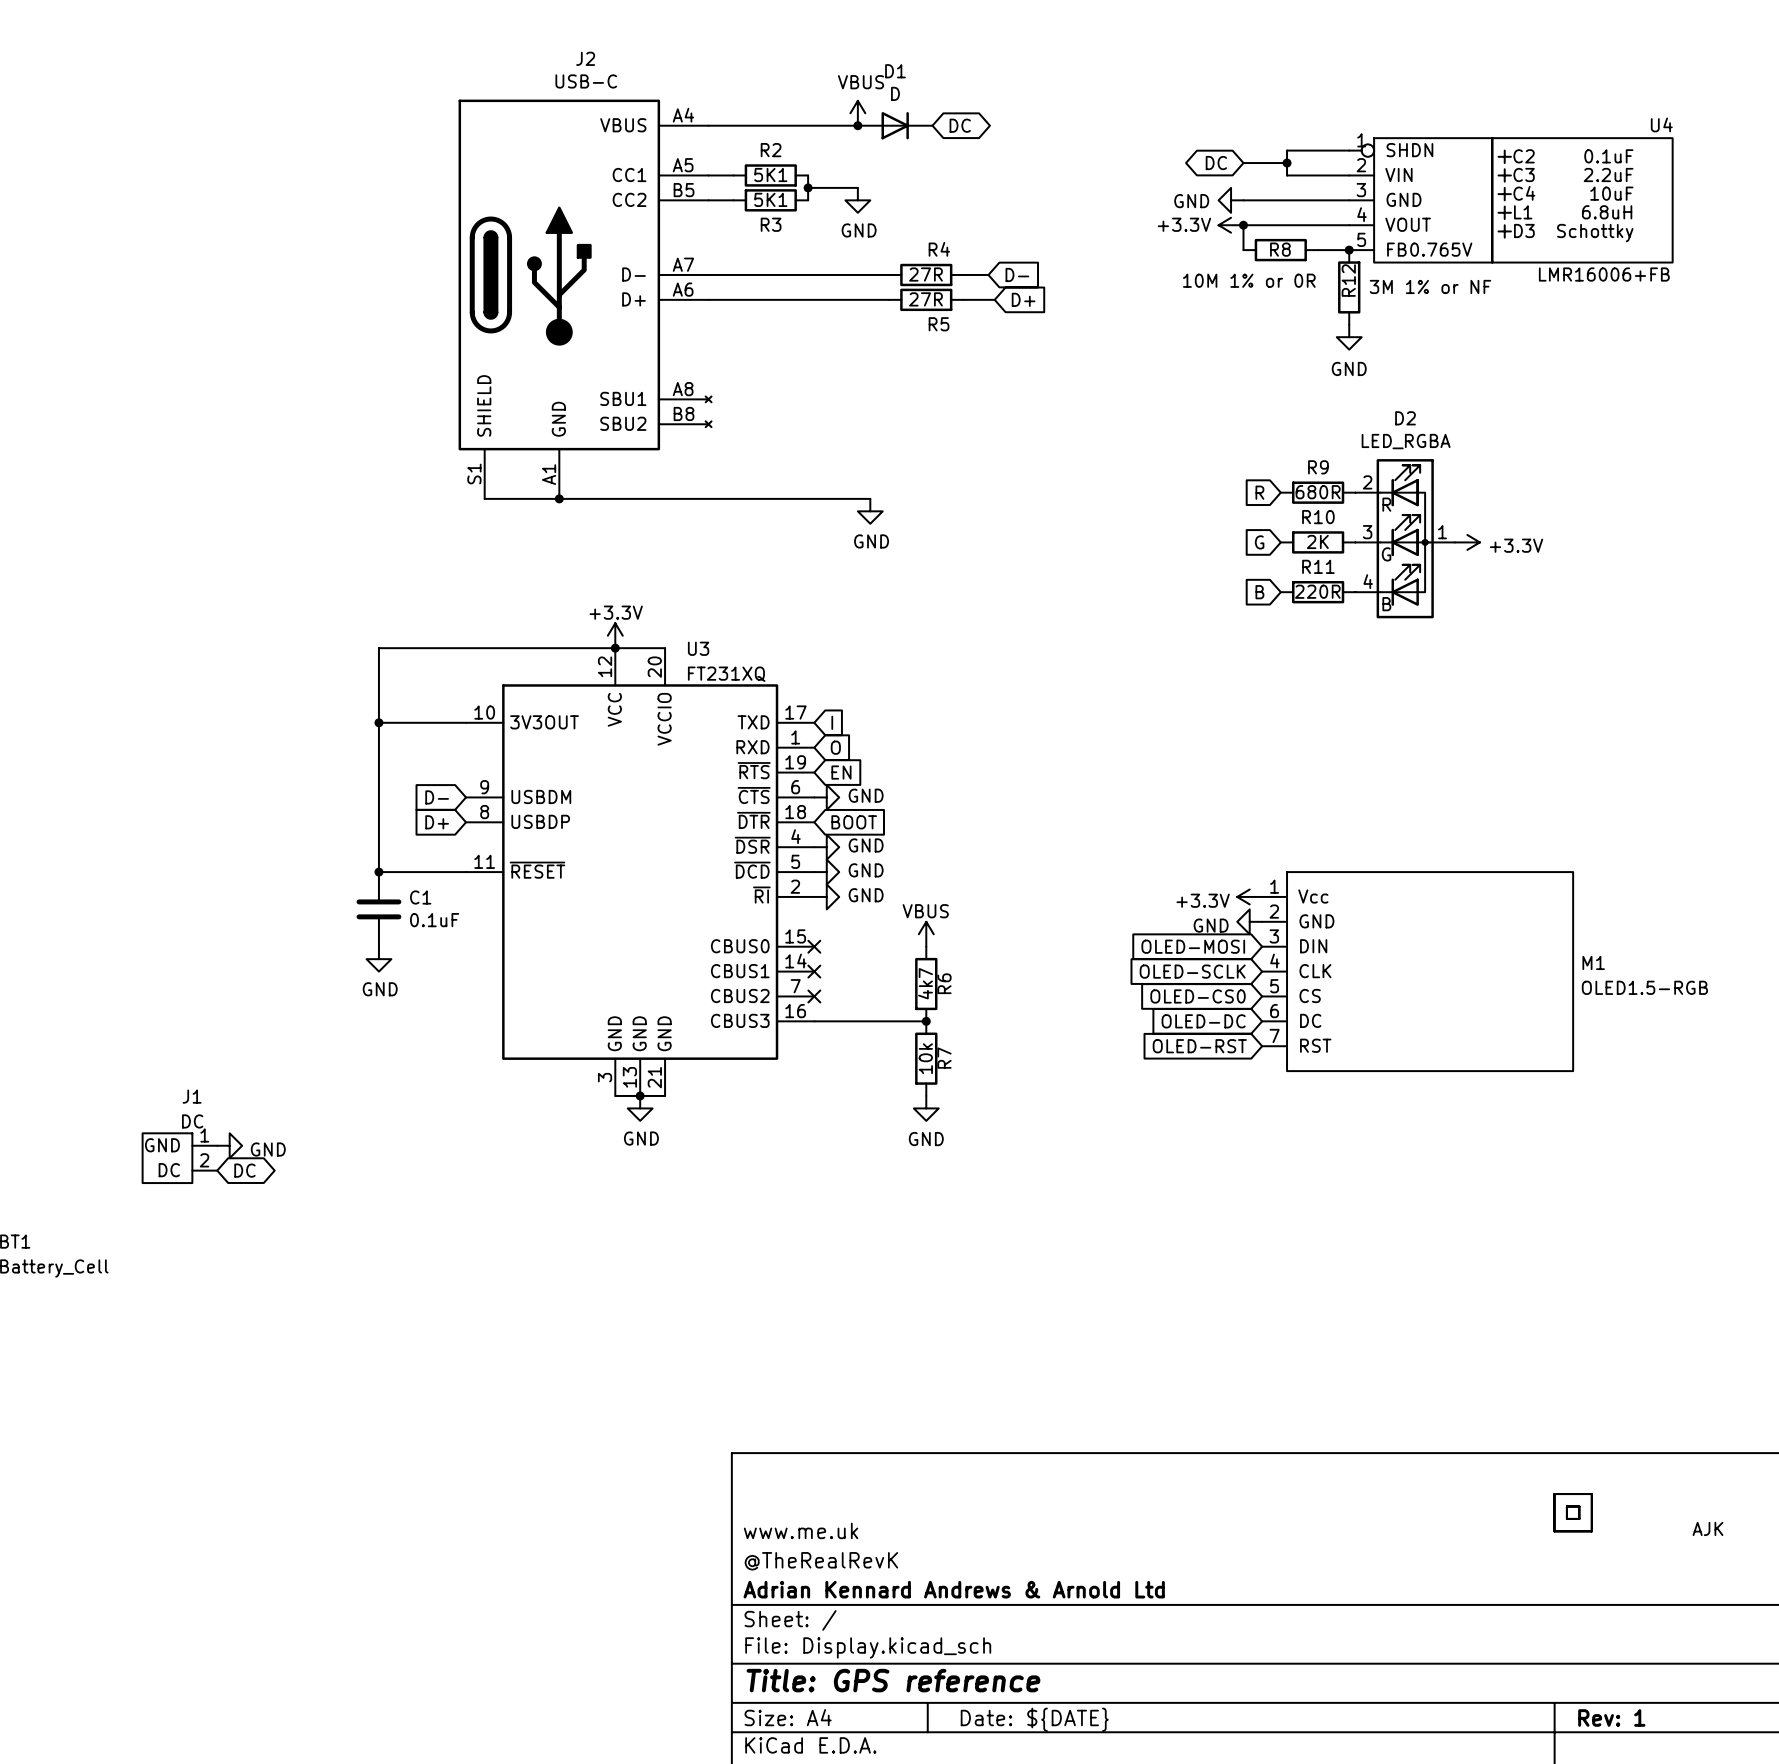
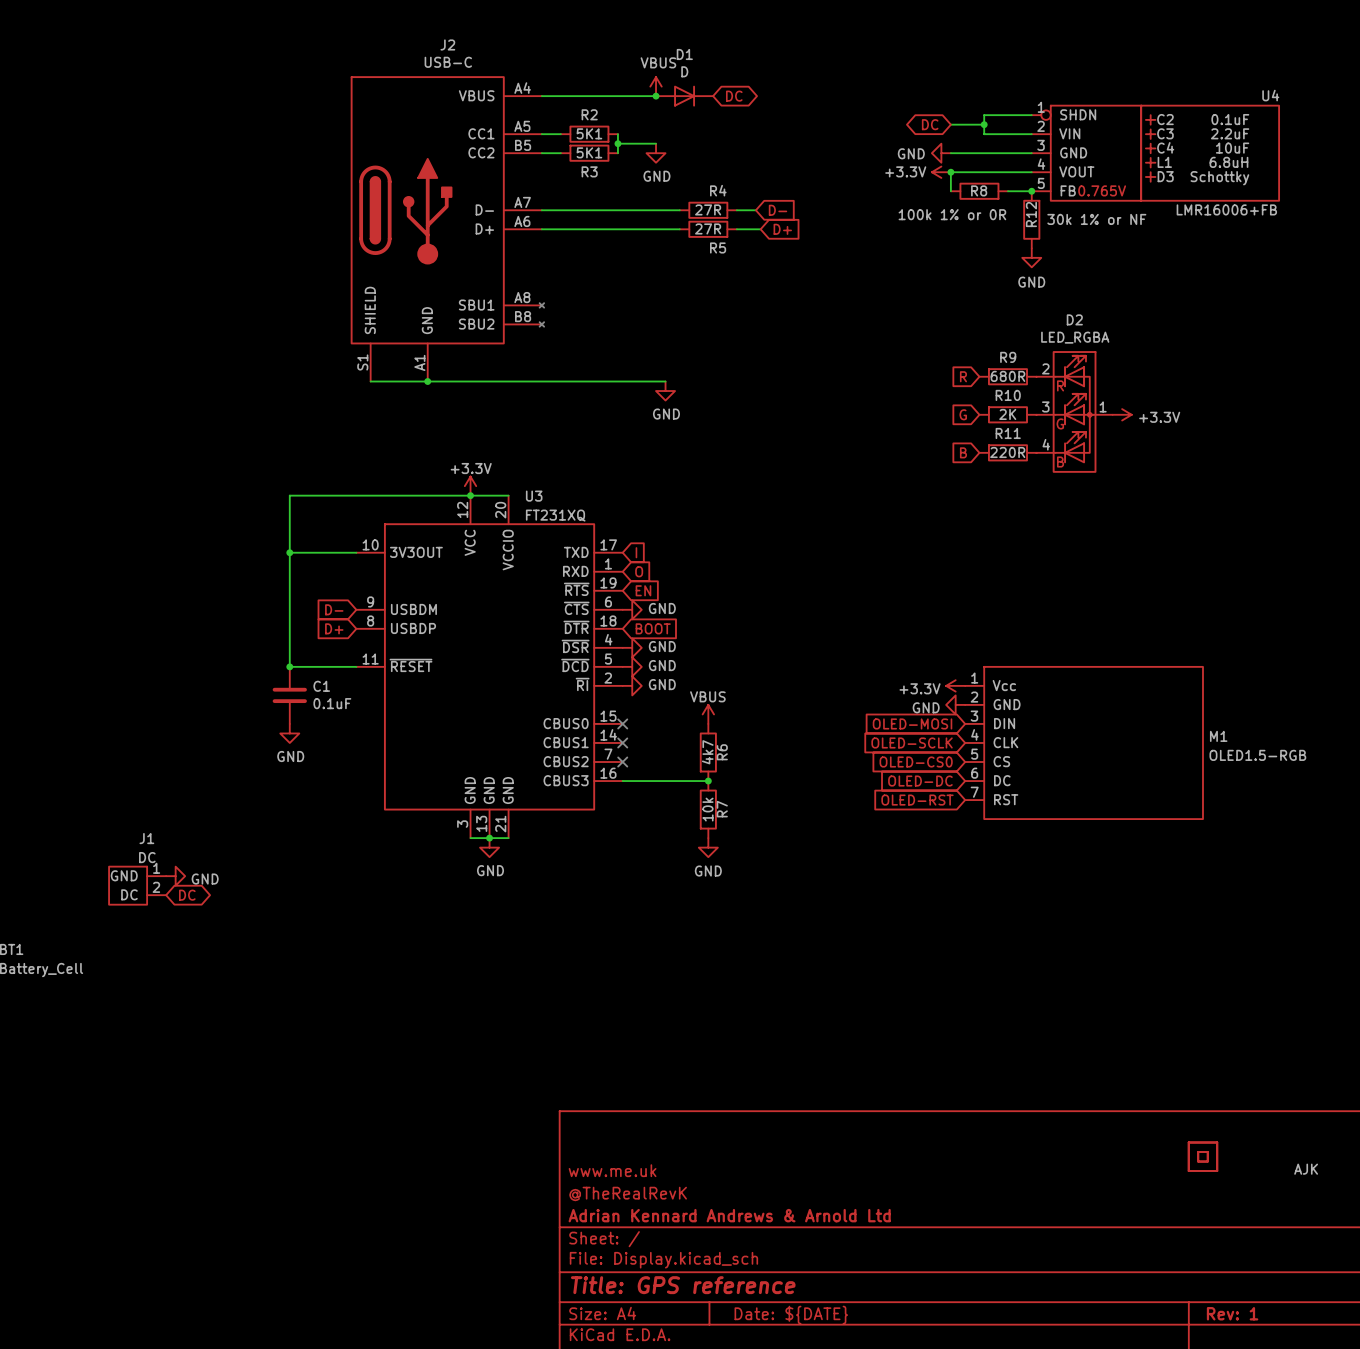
R8 value: 10M 1% or 0R (1249, 280) -> 100k 1% or 0R (952, 214)
R12 value: 3M 1% or NF (1430, 286) -> 30k 1% or NF (1096, 219)

